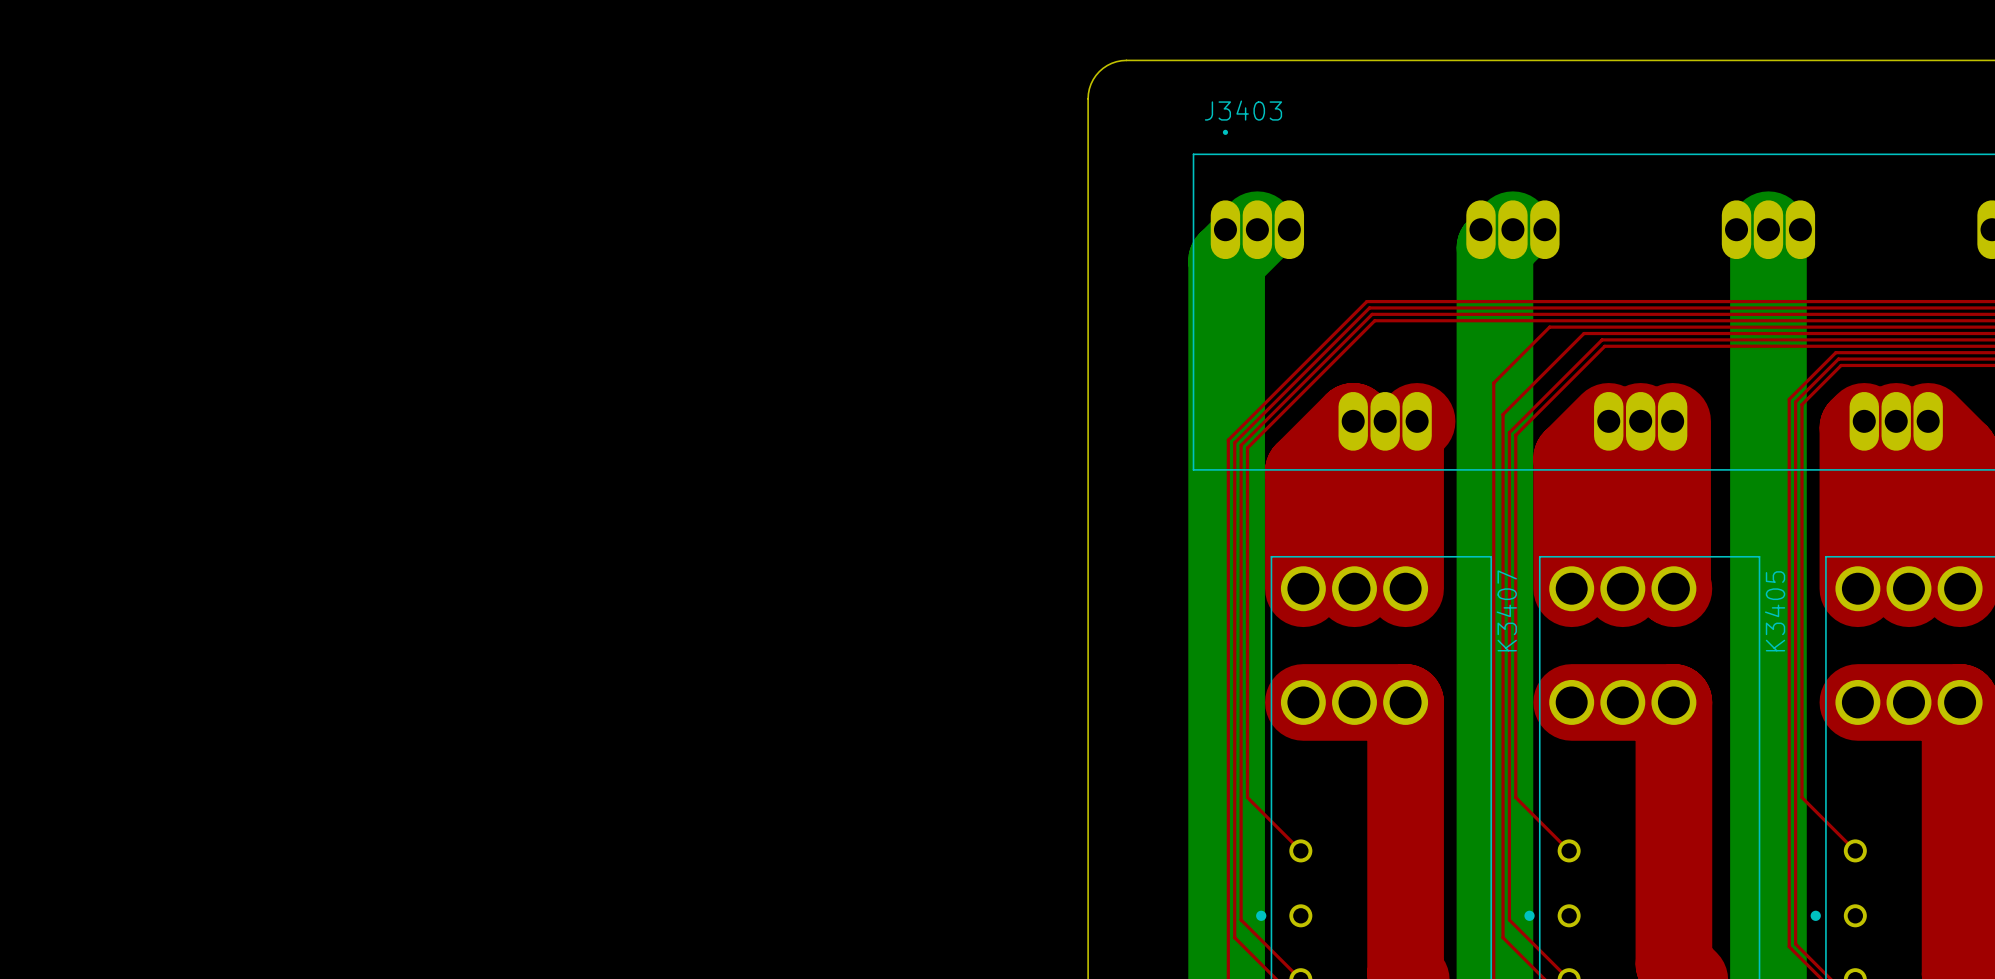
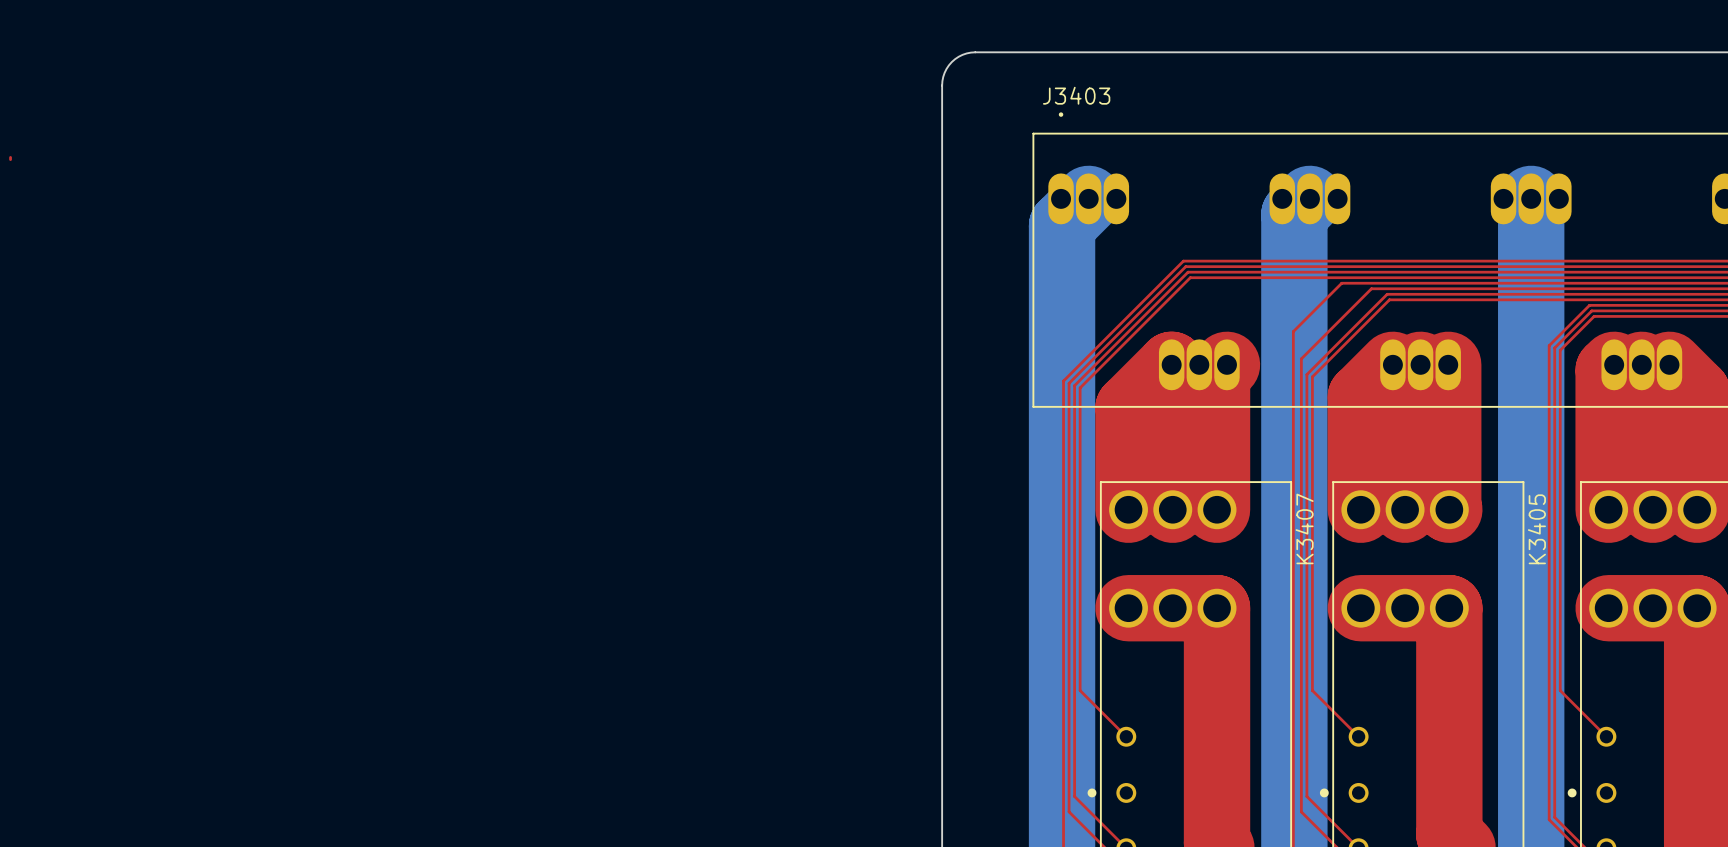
top track: none -> (10, 157) (10, 159)

